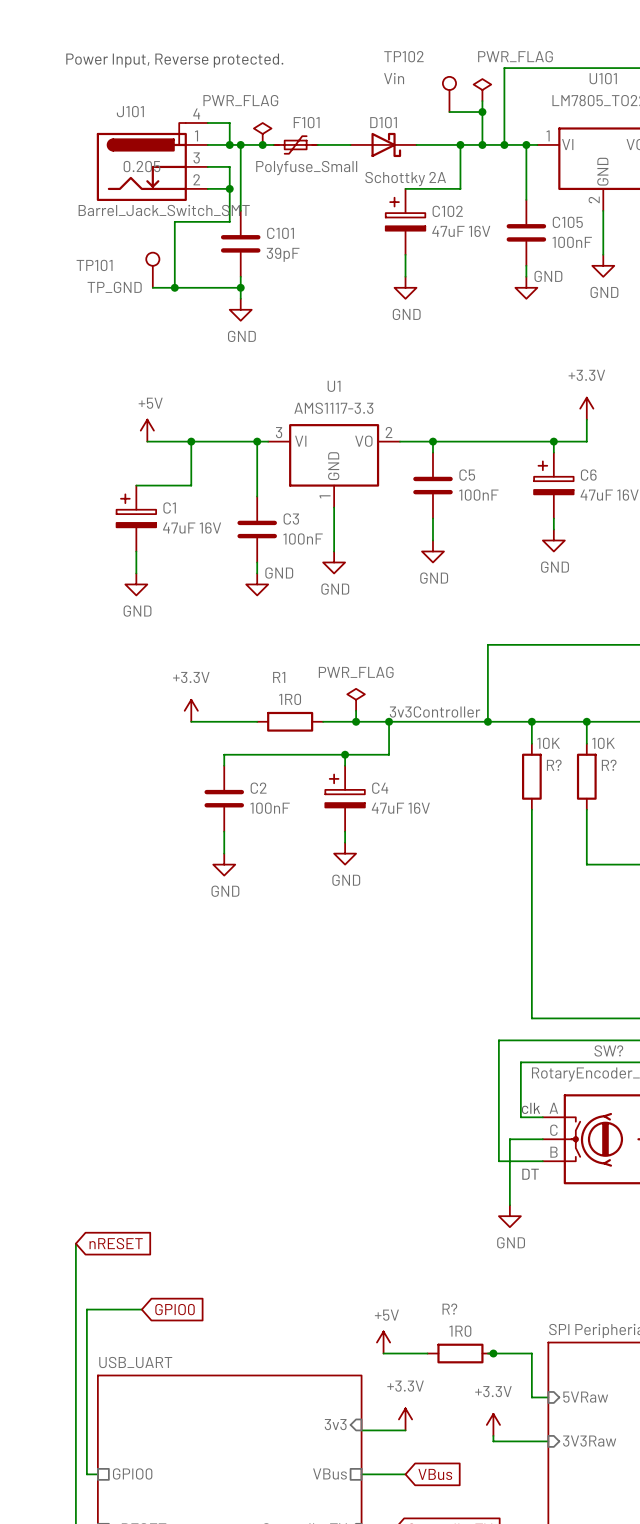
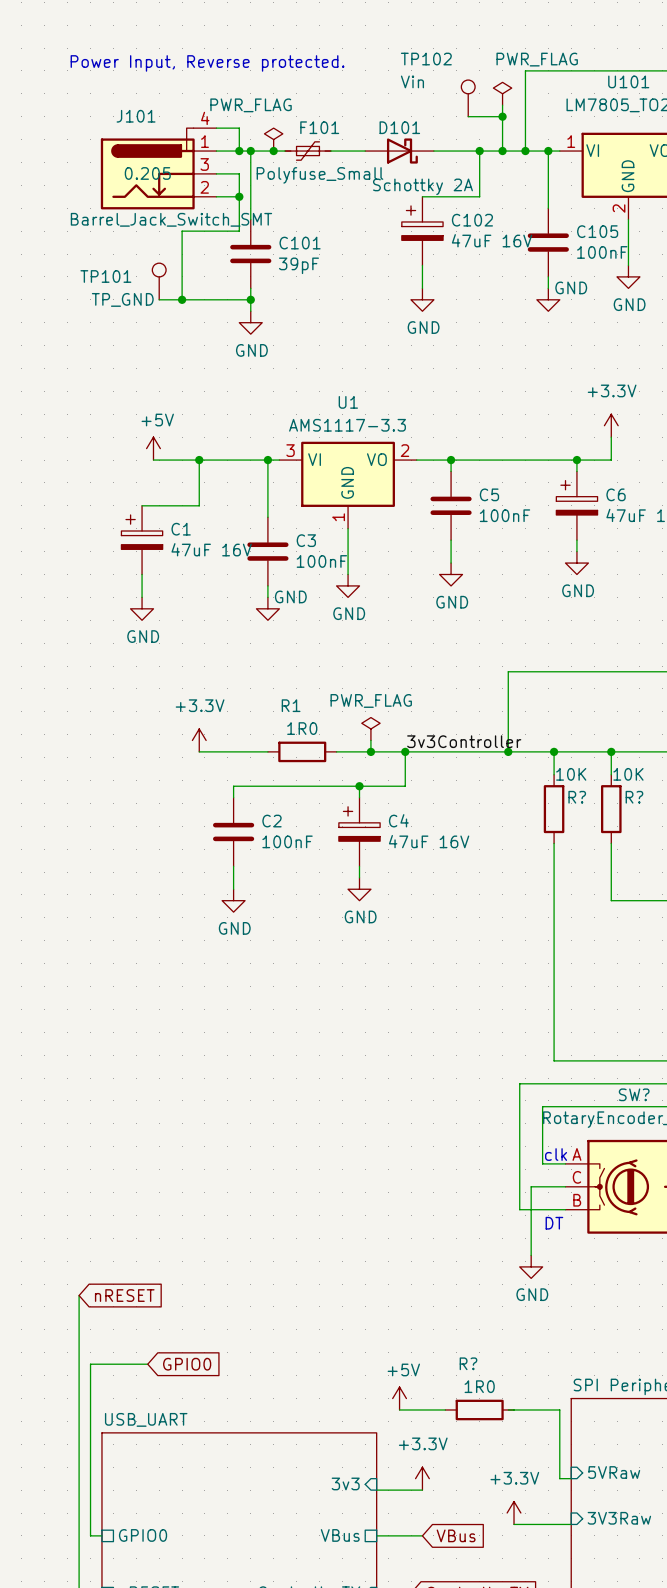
junction: (493, 1353) -> none
wire: (531, 1353) (531, 1397) (548, 1397) -> (554, 1409) (559, 1409) (559, 1478) (571, 1478)
sheet pin position: 5VRaw (585, 1397) -> 5VRaw (614, 1472)
power symbol position: +3.3V (493, 1424) -> +3.3V (514, 1513)
wire: (493, 1435) (493, 1441) (548, 1441) -> none
sheet pin position: 3V3Raw (589, 1441) -> 3V3Raw (619, 1518)
wire: none -> (514, 1524) (571, 1524)

